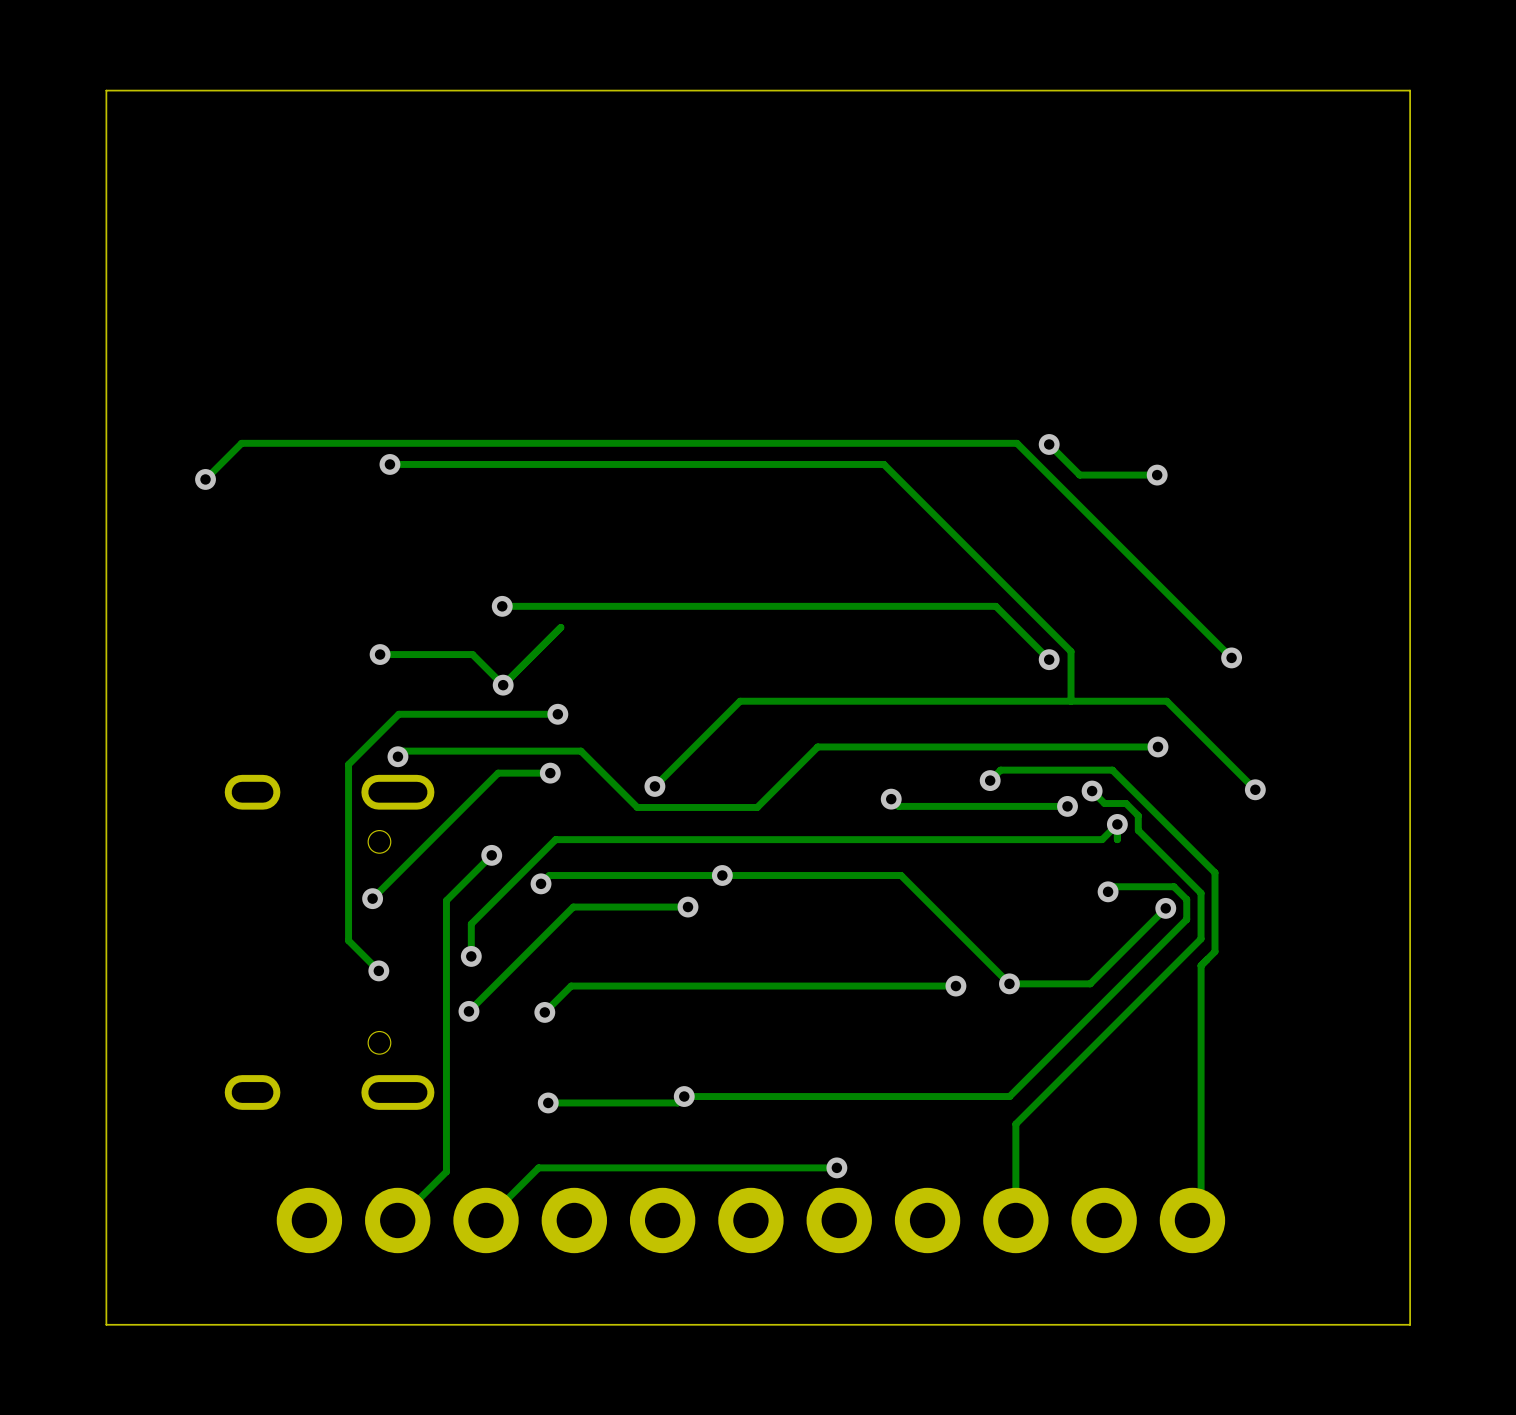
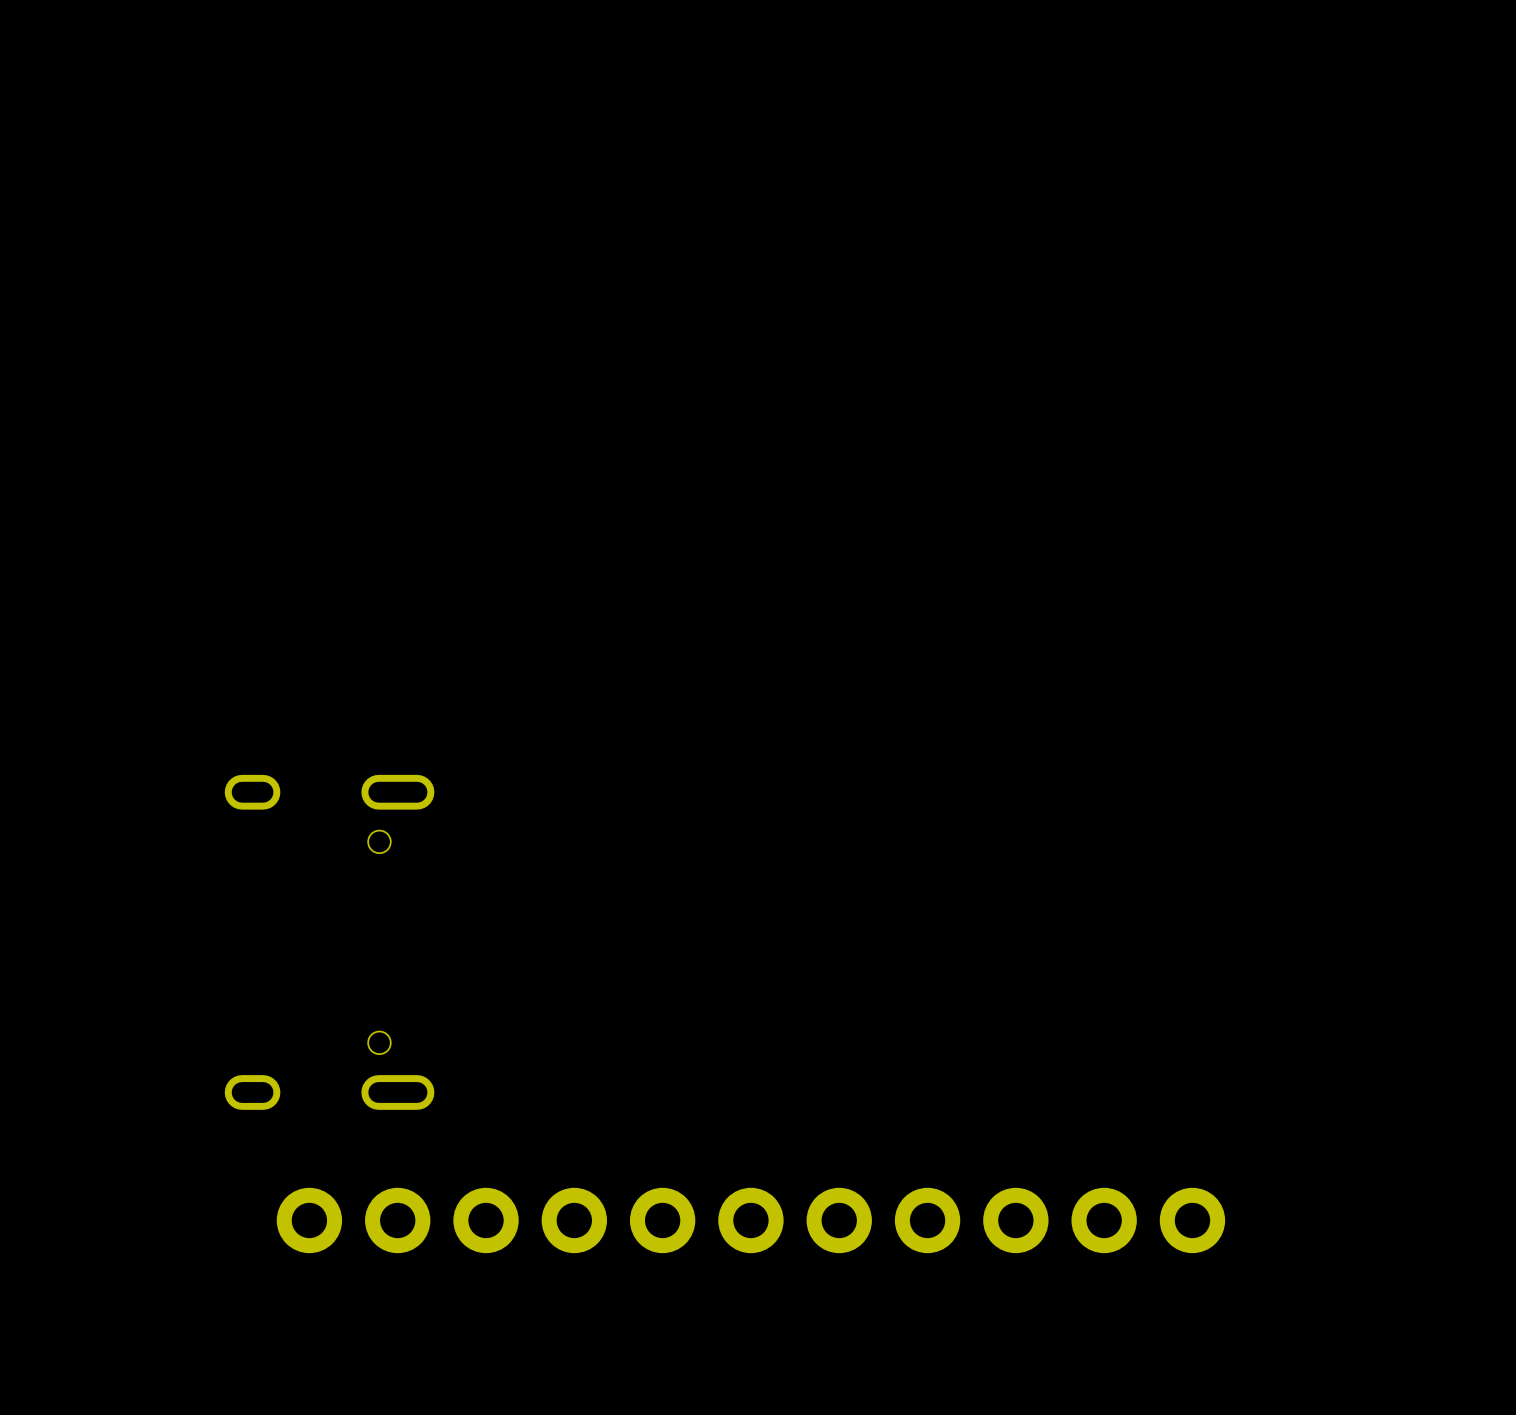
board edge: (1410, 90) (106, 90) (106, 1324) (1410, 1324) (1410, 90) -> none
track: (1049, 444) (1079, 475) (1157, 475) -> none
via: (1049, 444) -> none
track: (389, 464) (883, 464) (1071, 651) (1071, 701) -> none
via: (389, 464) -> none
via: (1157, 475) -> none
track: (205, 479) (241, 443) (1016, 443) (1231, 657) -> none
via: (205, 479) -> none
track: (502, 606) (995, 606) (1049, 659) -> none
via: (502, 606) -> none
track: (560, 627) (503, 685) (472, 654) (380, 654) -> none
via: (380, 654) -> none
via: (1231, 657) -> none
via: (1049, 659) -> none
via: (503, 685) -> none
track: (557, 714) (398, 714) (348, 764) (348, 940) (378, 970) -> none
via: (557, 714) -> none
track: (1157, 746) (817, 746) (757, 807) (637, 807) (581, 751) (403, 751) (397, 756) -> none
via: (1157, 746) -> none
via: (397, 756) -> none
track: (550, 773) (498, 773) (372, 898) -> none
via: (550, 773) -> none
track: (990, 780) (1000, 770) (1112, 770) (1215, 872) (1215, 951) (1201, 965) (1201, 1211) (1192, 1220) -> none
via: (990, 780) -> none
track: (654, 786) (740, 701) (1166, 701) (1255, 789) -> none
via: (654, 786) -> none
via: (1255, 789) -> none
track: (1092, 791) (1104, 803) (1126, 803) (1138, 815) (1138, 830) (1201, 893) (1201, 938) (1015, 1124) (1015, 1220) -> none
via: (1092, 791) -> none
track: (891, 799) (898, 806) (1067, 806) -> none
via: (891, 799) -> none
via: (1067, 806) -> none
via: (1117, 824) -> none
track: (1117, 839) (1117, 824) (1102, 839) (555, 839) (471, 923) (471, 956) -> none
track: (491, 855) (446, 900) (446, 1171) (397, 1220) -> none
via: (491, 855) -> none
via: (722, 875) -> none
track: (541, 883) (549, 875) (901, 875) (1009, 983) (1090, 983) (1165, 908) -> none
via: (541, 883) -> none
track: (1108, 891) (1113, 886) (1173, 886) (1186, 899) (1186, 919) (1009, 1096) (684, 1096) (677, 1102) (548, 1102) -> none
via: (1108, 891) -> none
via: (372, 898) -> none
track: (688, 907) (573, 907) (468, 1011) -> none
via: (688, 907) -> none
via: (1165, 908) -> none
via: (471, 956) -> none
via: (378, 970) -> none
via: (1009, 983) -> none
track: (955, 986) (571, 986) (544, 1012) -> none
via: (955, 986) -> none
via: (468, 1011) -> none
via: (544, 1012) -> none
via: (684, 1096) -> none
via: (548, 1102) -> none
track: (836, 1167) (538, 1167) (486, 1220) -> none
via: (836, 1167) -> none

